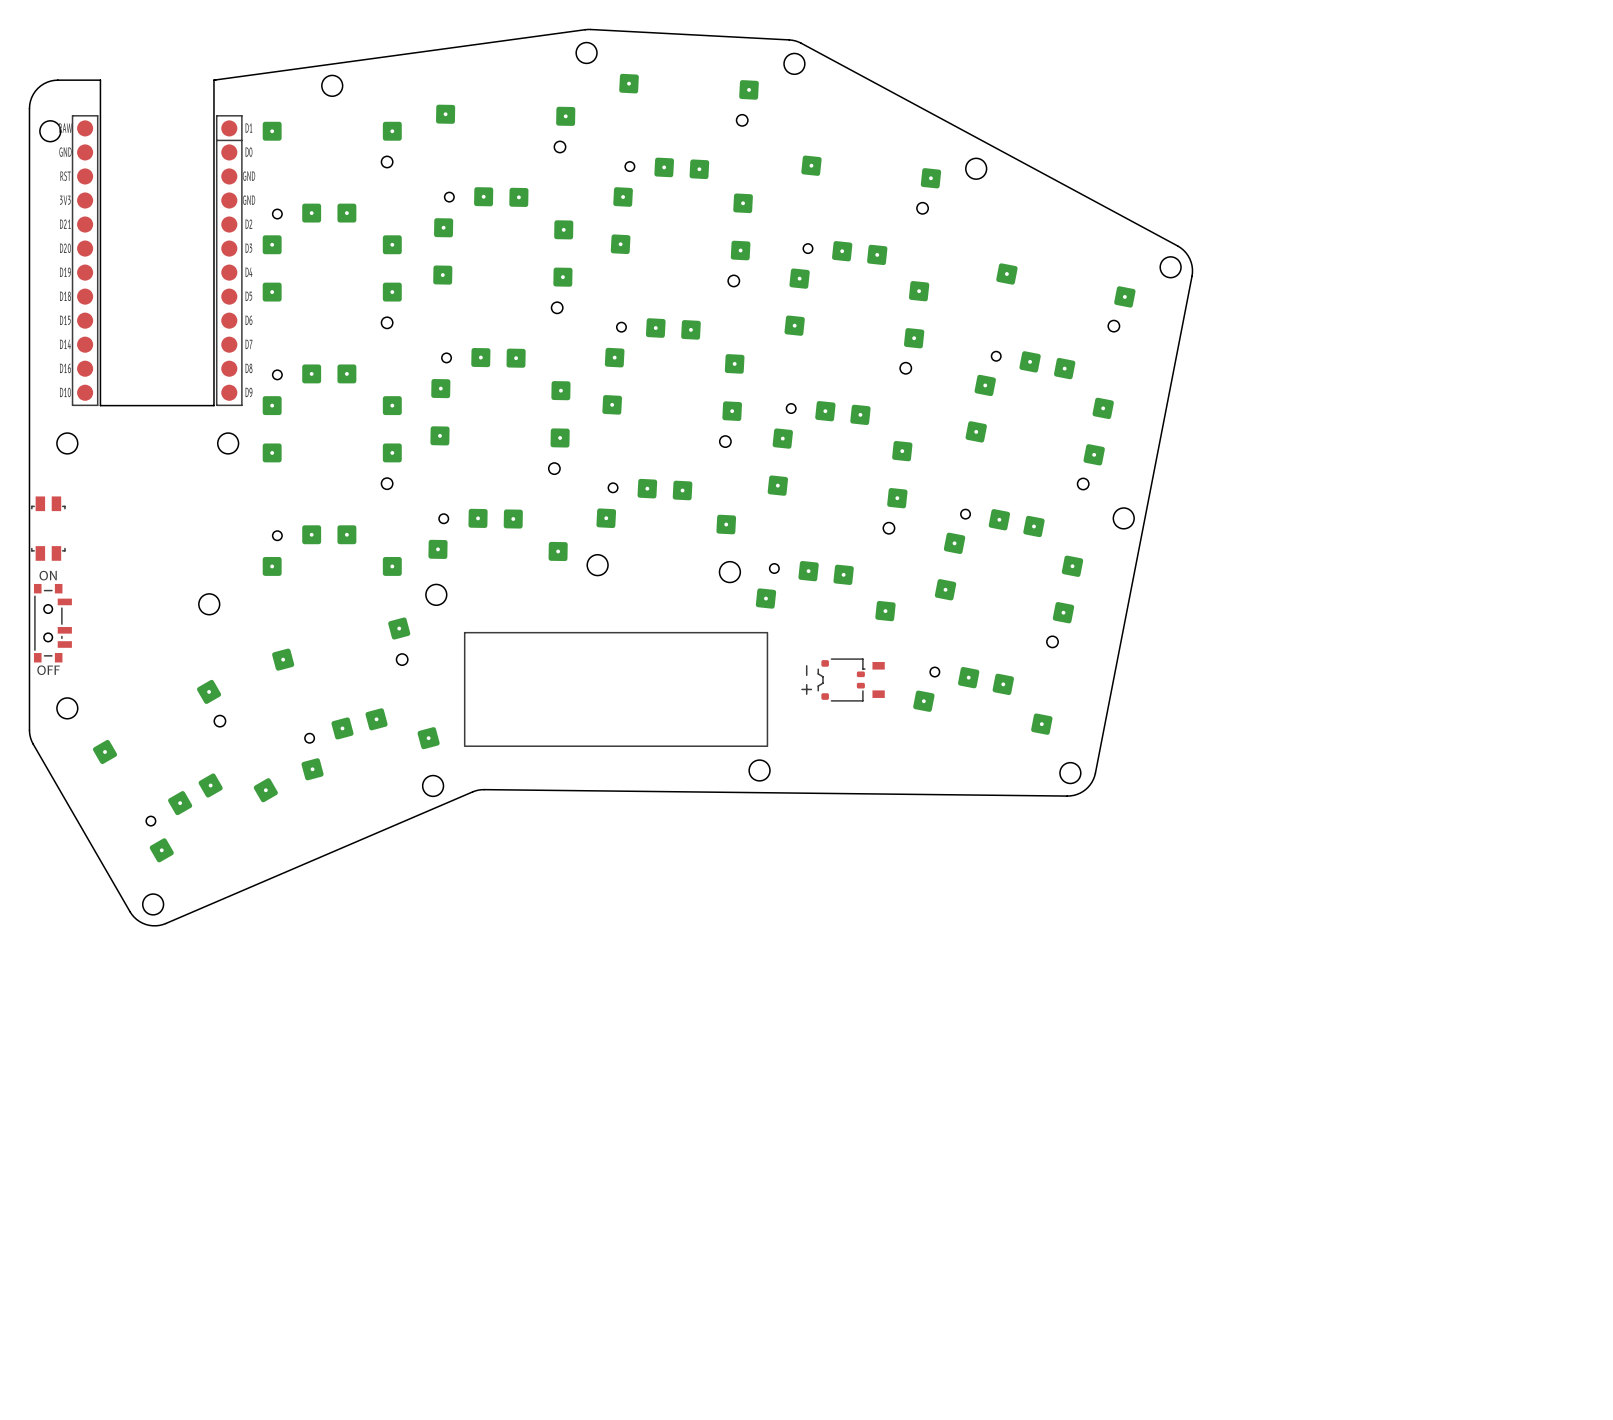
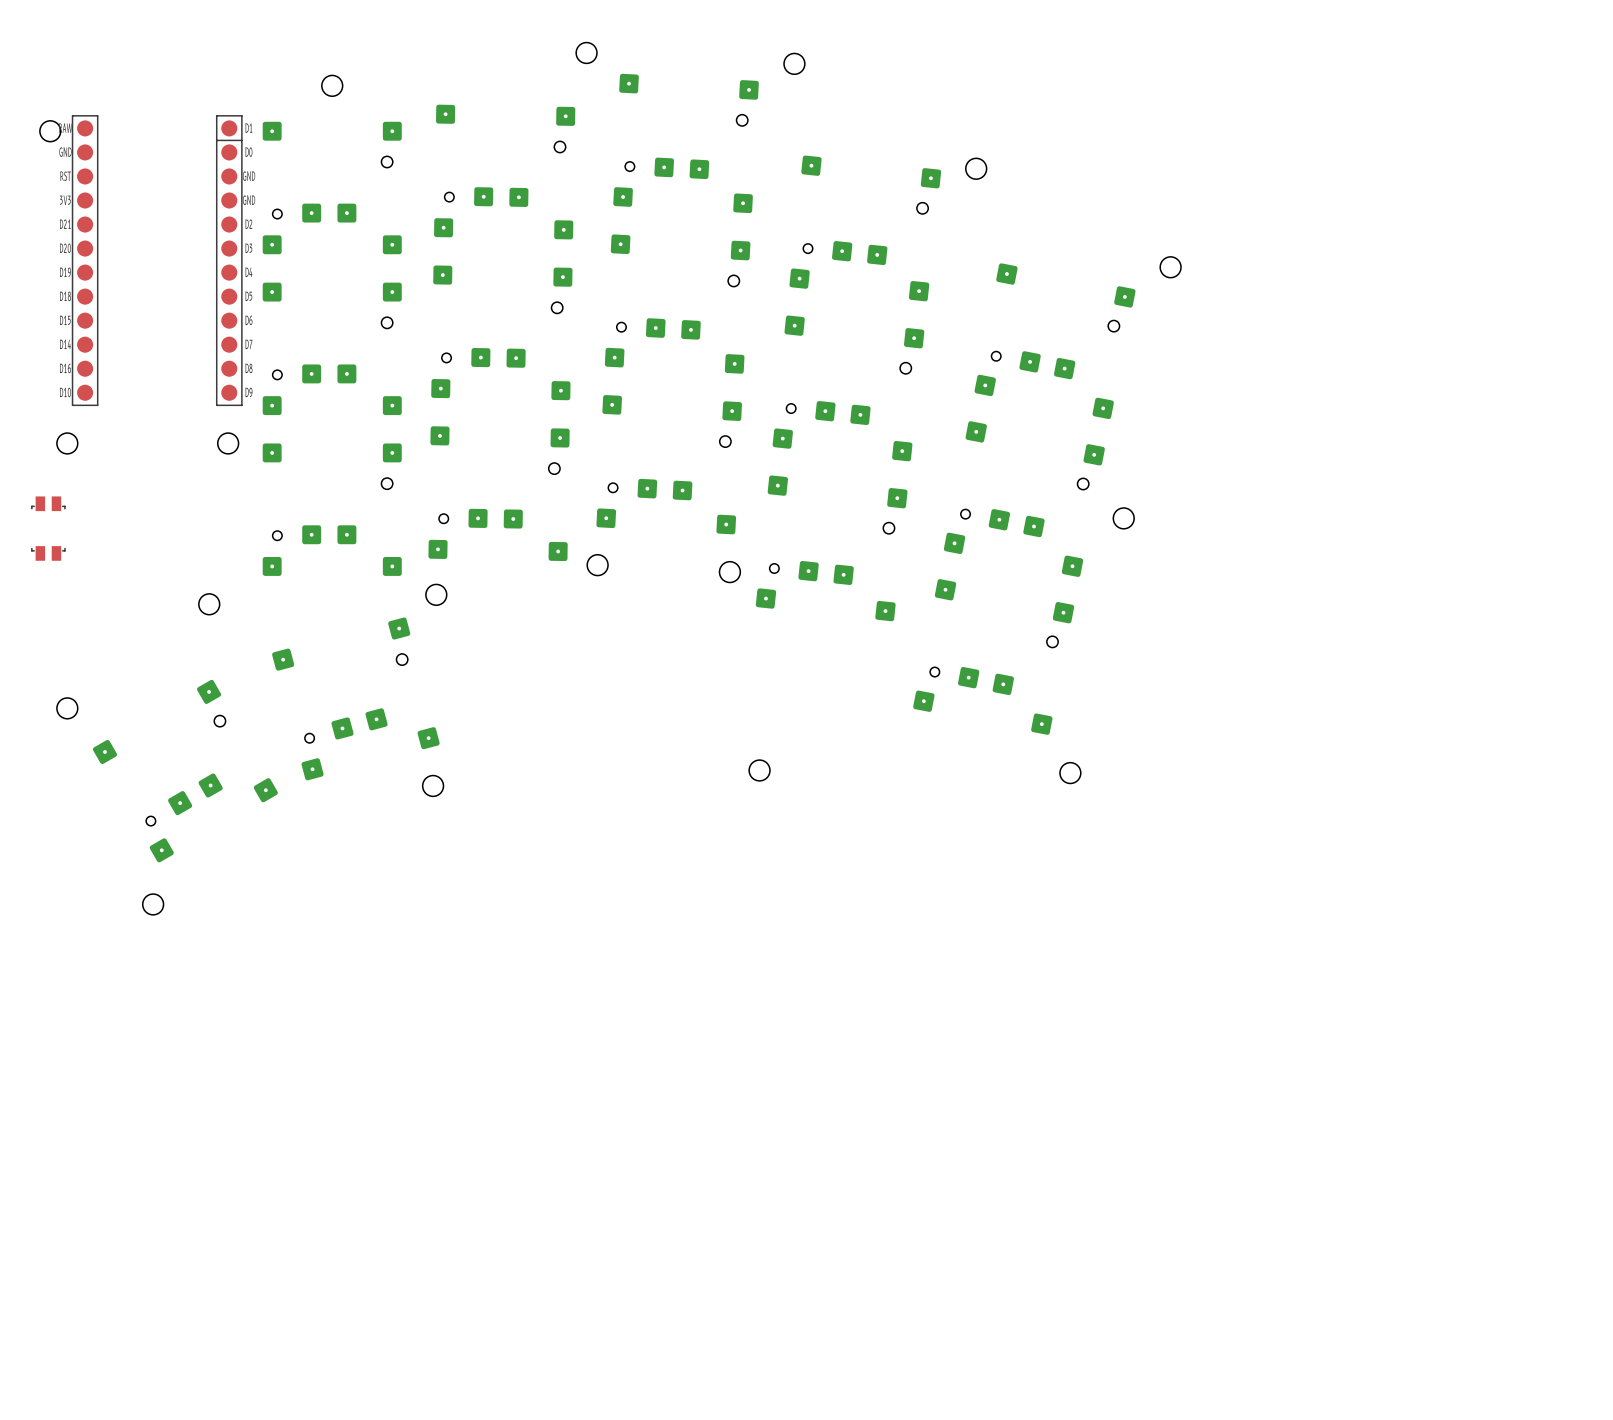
board edge: (590, 29) (798, 41) (1177, 245) (1188, 255) (1192, 265) (1191, 276) (1093, 779) (1082, 791) (1067, 796) (478, 790) (165, 923) (152, 925) (142, 923) (129, 911) (33, 744) (29, 732) (29, 108) (33, 94) (40, 86) (50, 81) (100, 80) (100, 405) (213, 405) (213, 80) (590, 29) -> none
part: (52, 623) -> none
drawing: [464, 632, 768, 747] -> none
part: (878, 665) -> none
part: (833, 679) -> none
part: (878, 694) -> none

